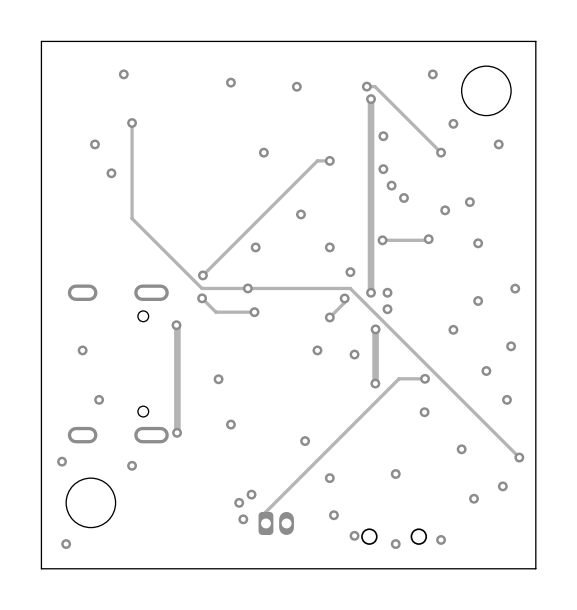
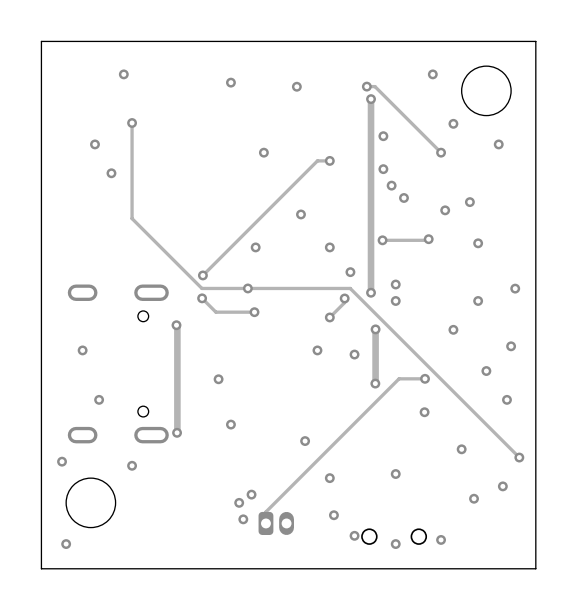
via: none -> (395, 284)
via: (387, 292) -> none
via: none -> (395, 300)
via: (387, 309) -> none

